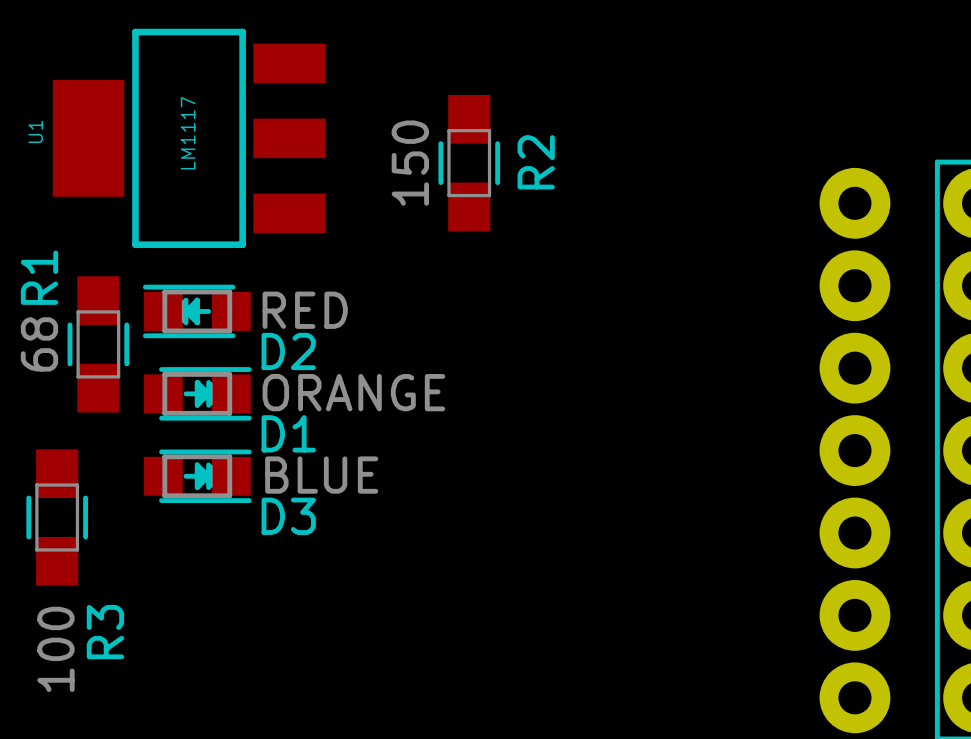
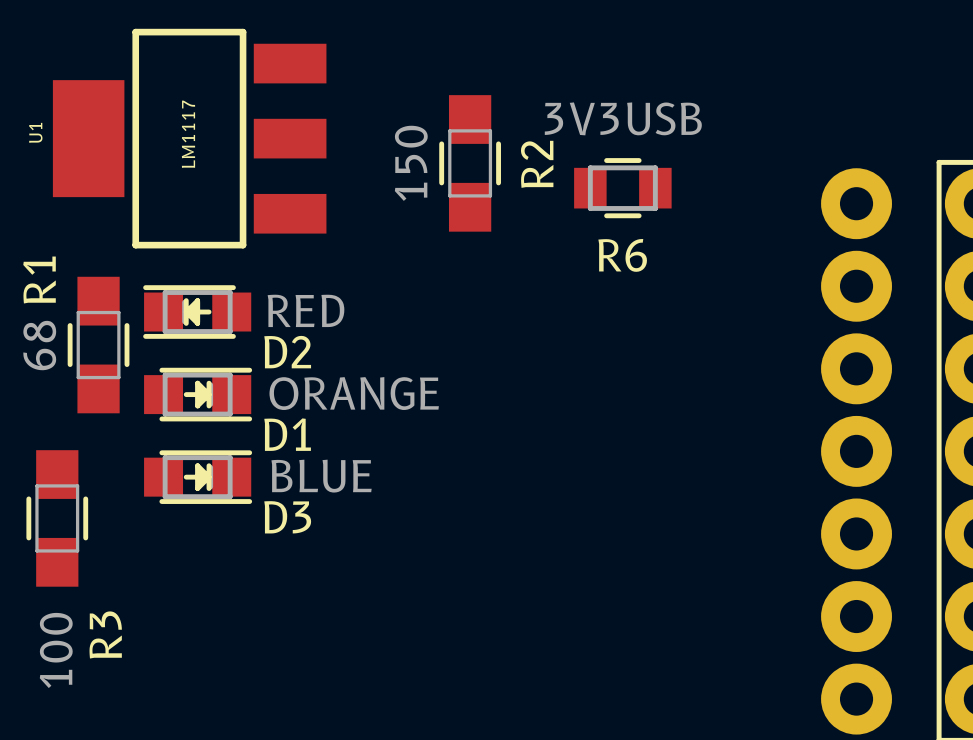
R6: none -> 3V3USB (622, 188)

